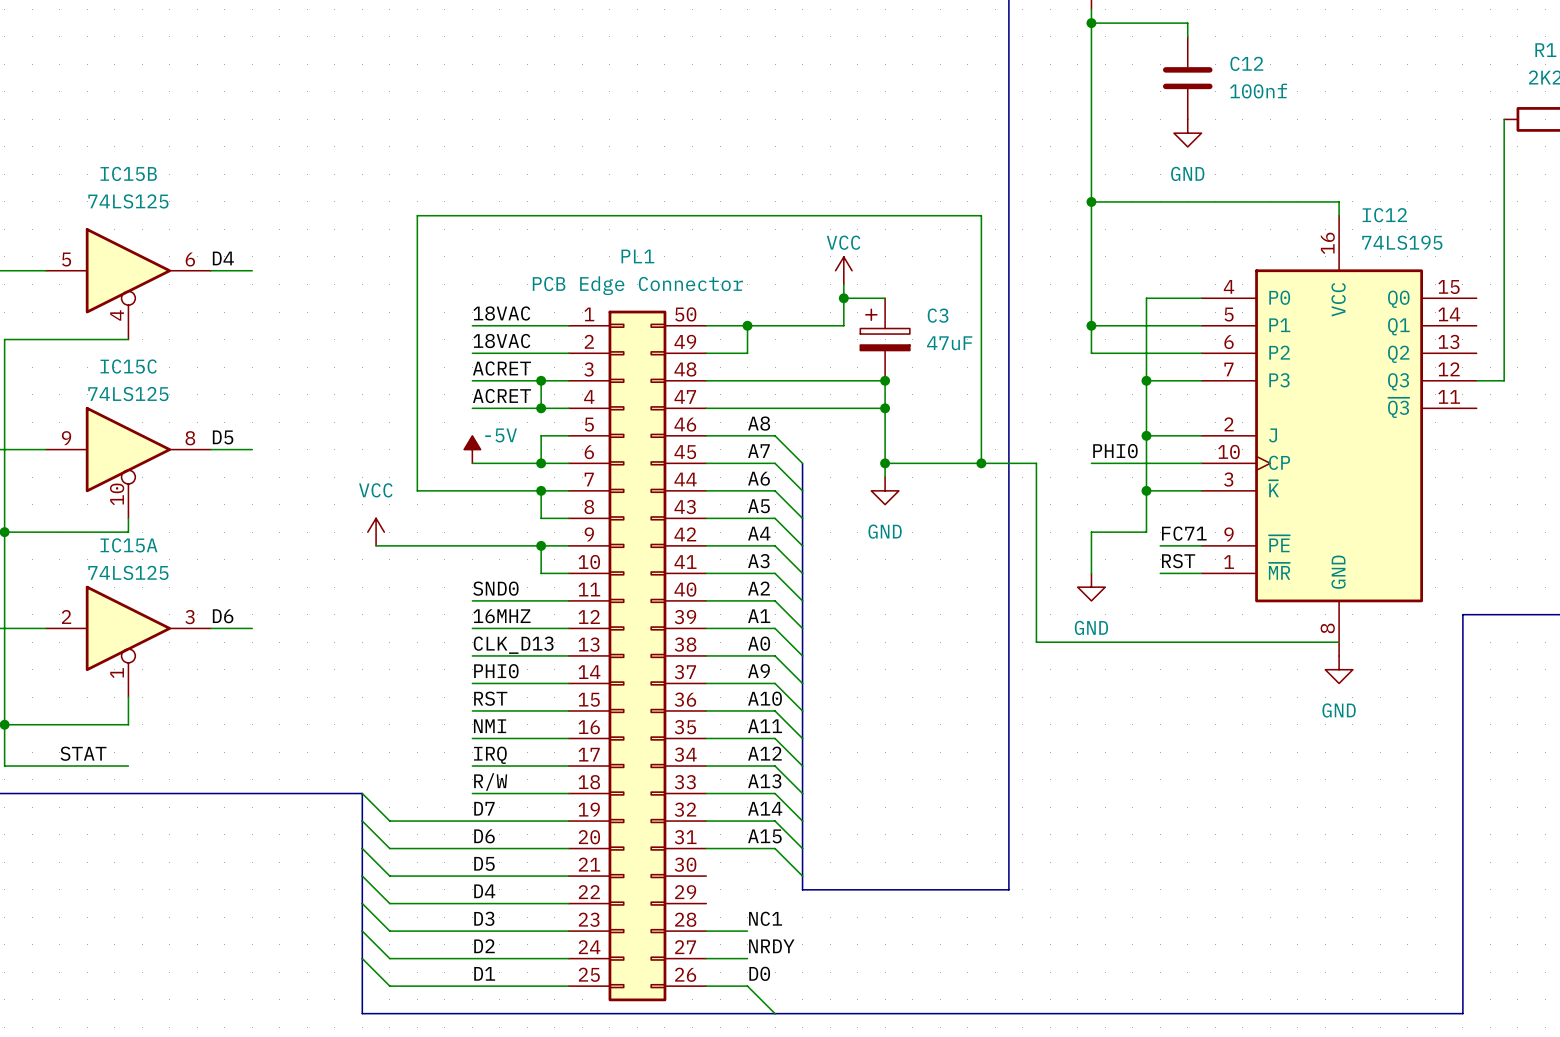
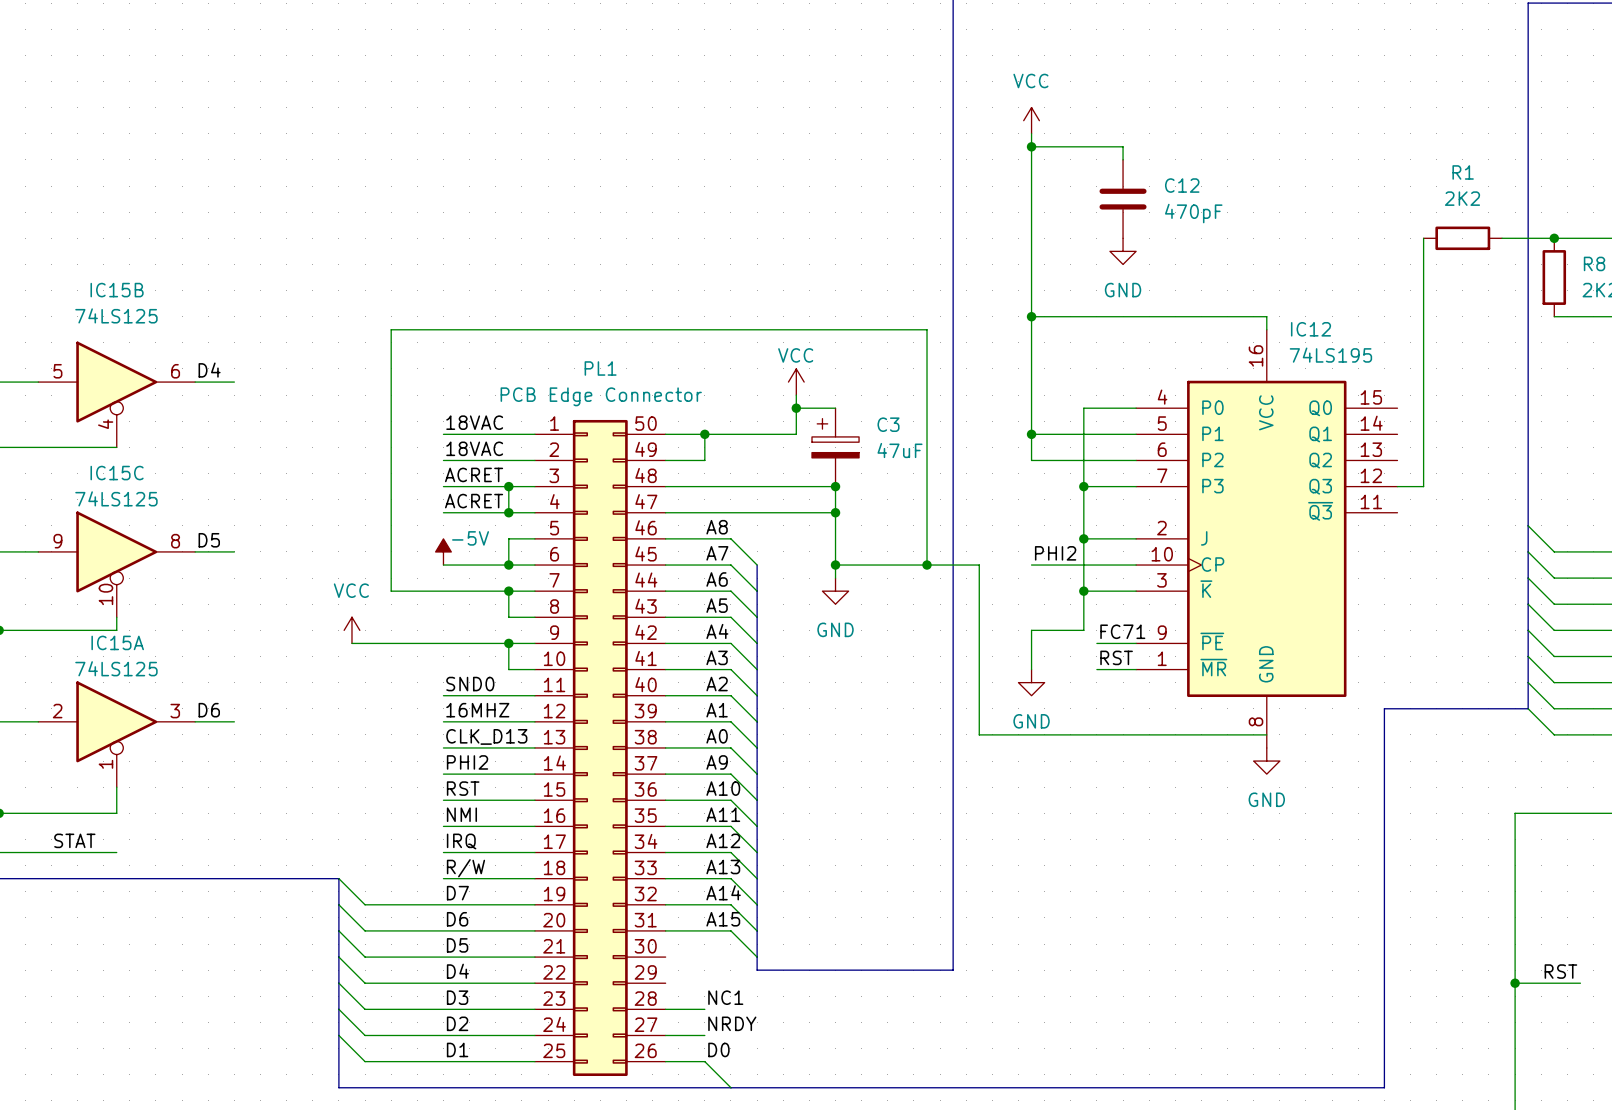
C12 value: 100nf (1258, 91) -> 470pF (1193, 213)
label: PHI0 (1115, 451) -> PHI2 (1055, 553)
label: PHI0 (496, 671) -> PHI2 (467, 762)

